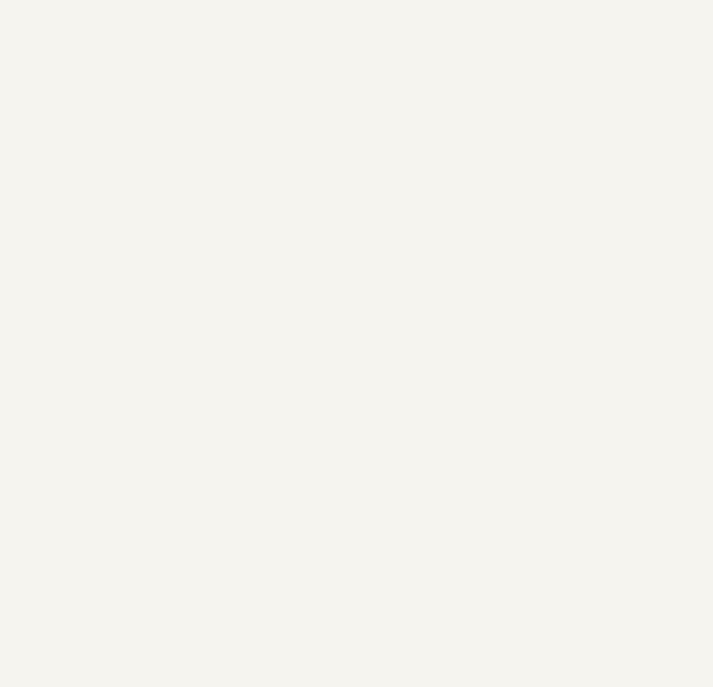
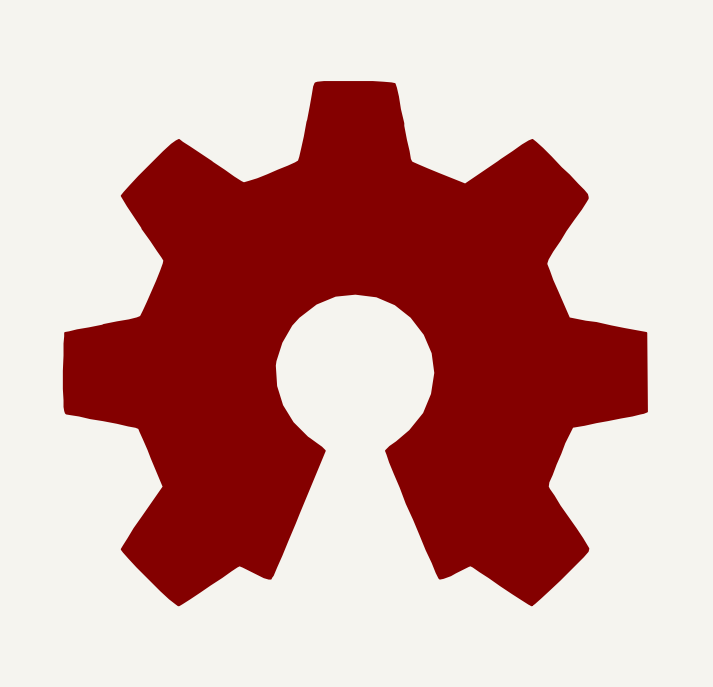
part: none -> (355, 343)

